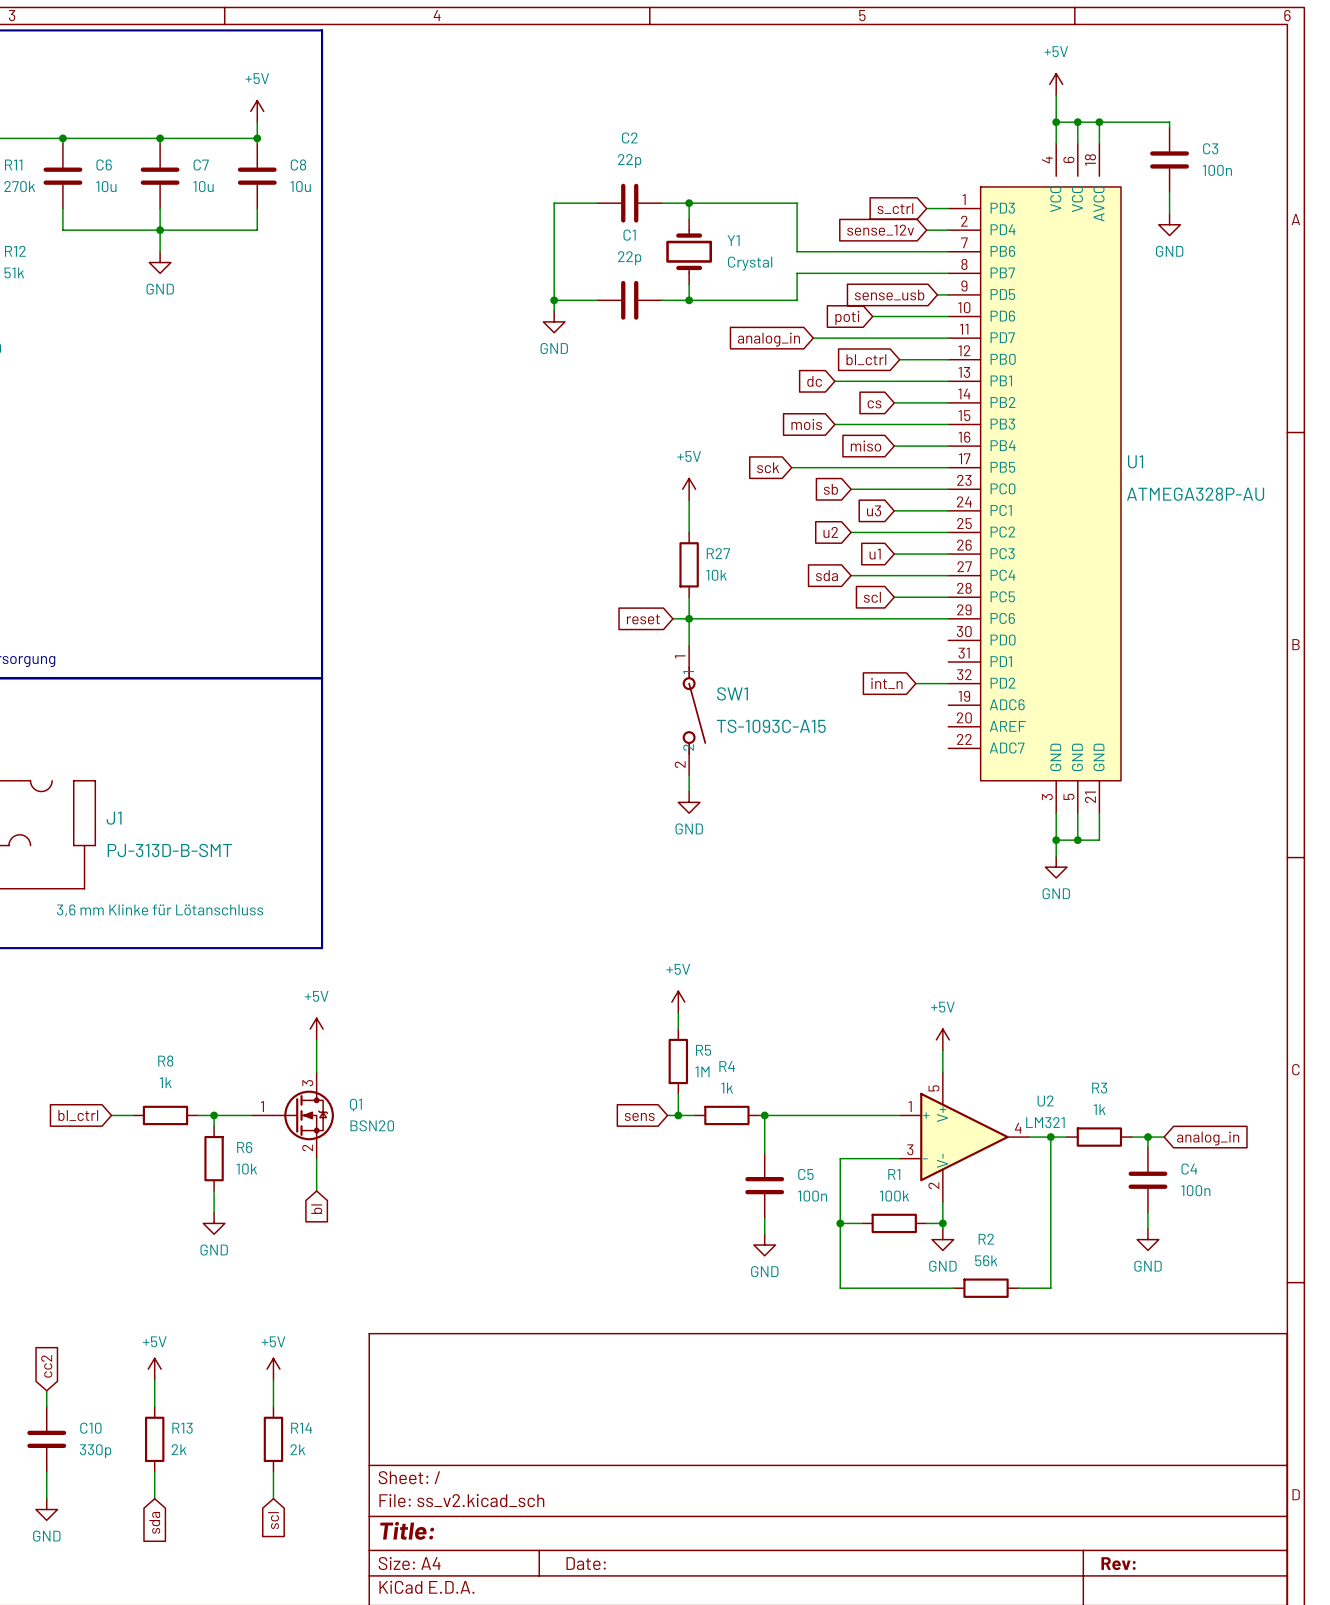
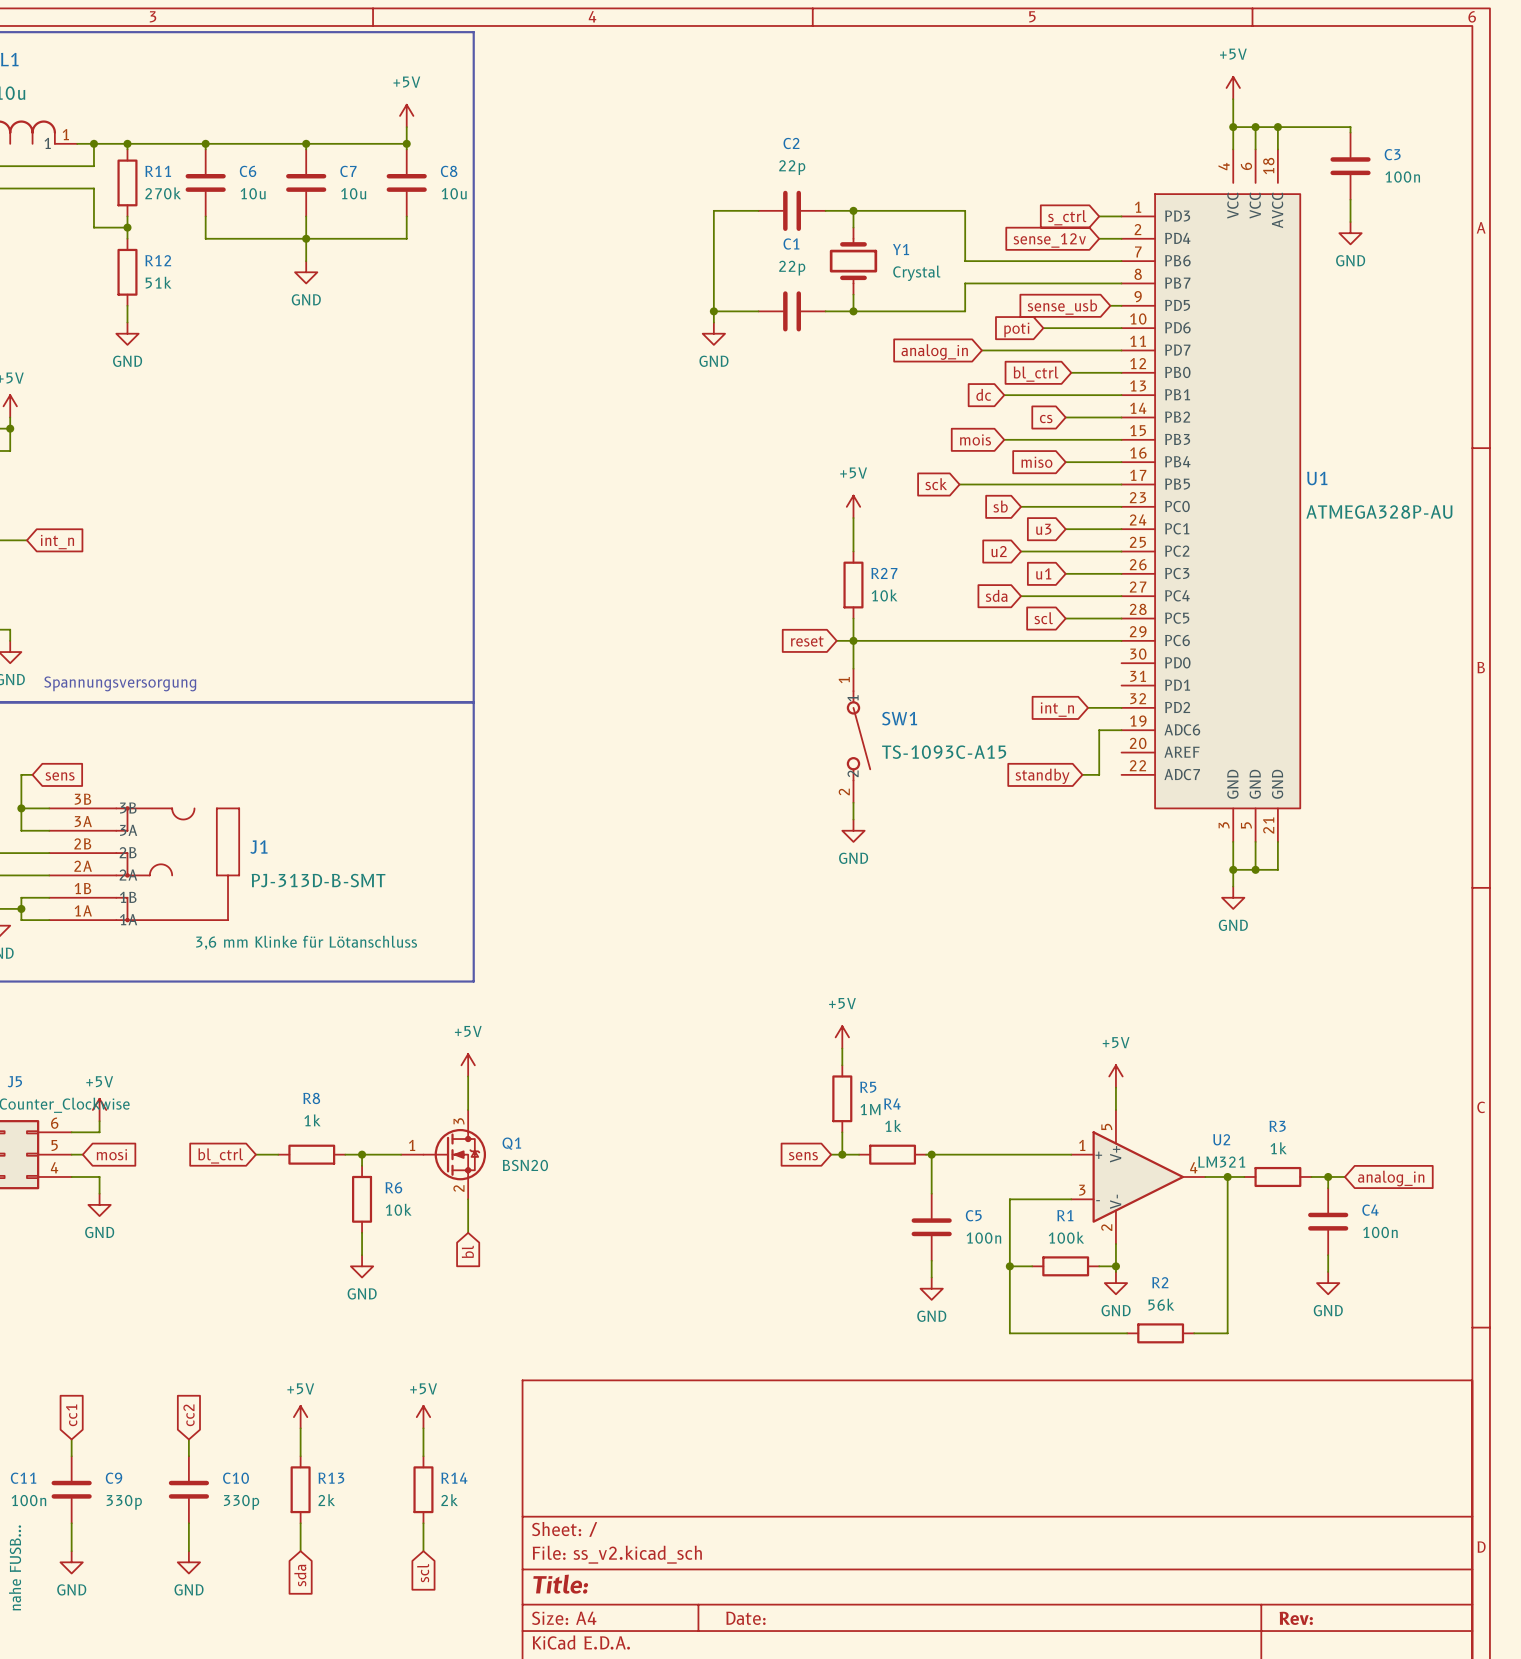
wire: none -> (1121, 730) (1099, 730) (1099, 774) (1082, 774)
global label: none -> standby (1042, 776)

